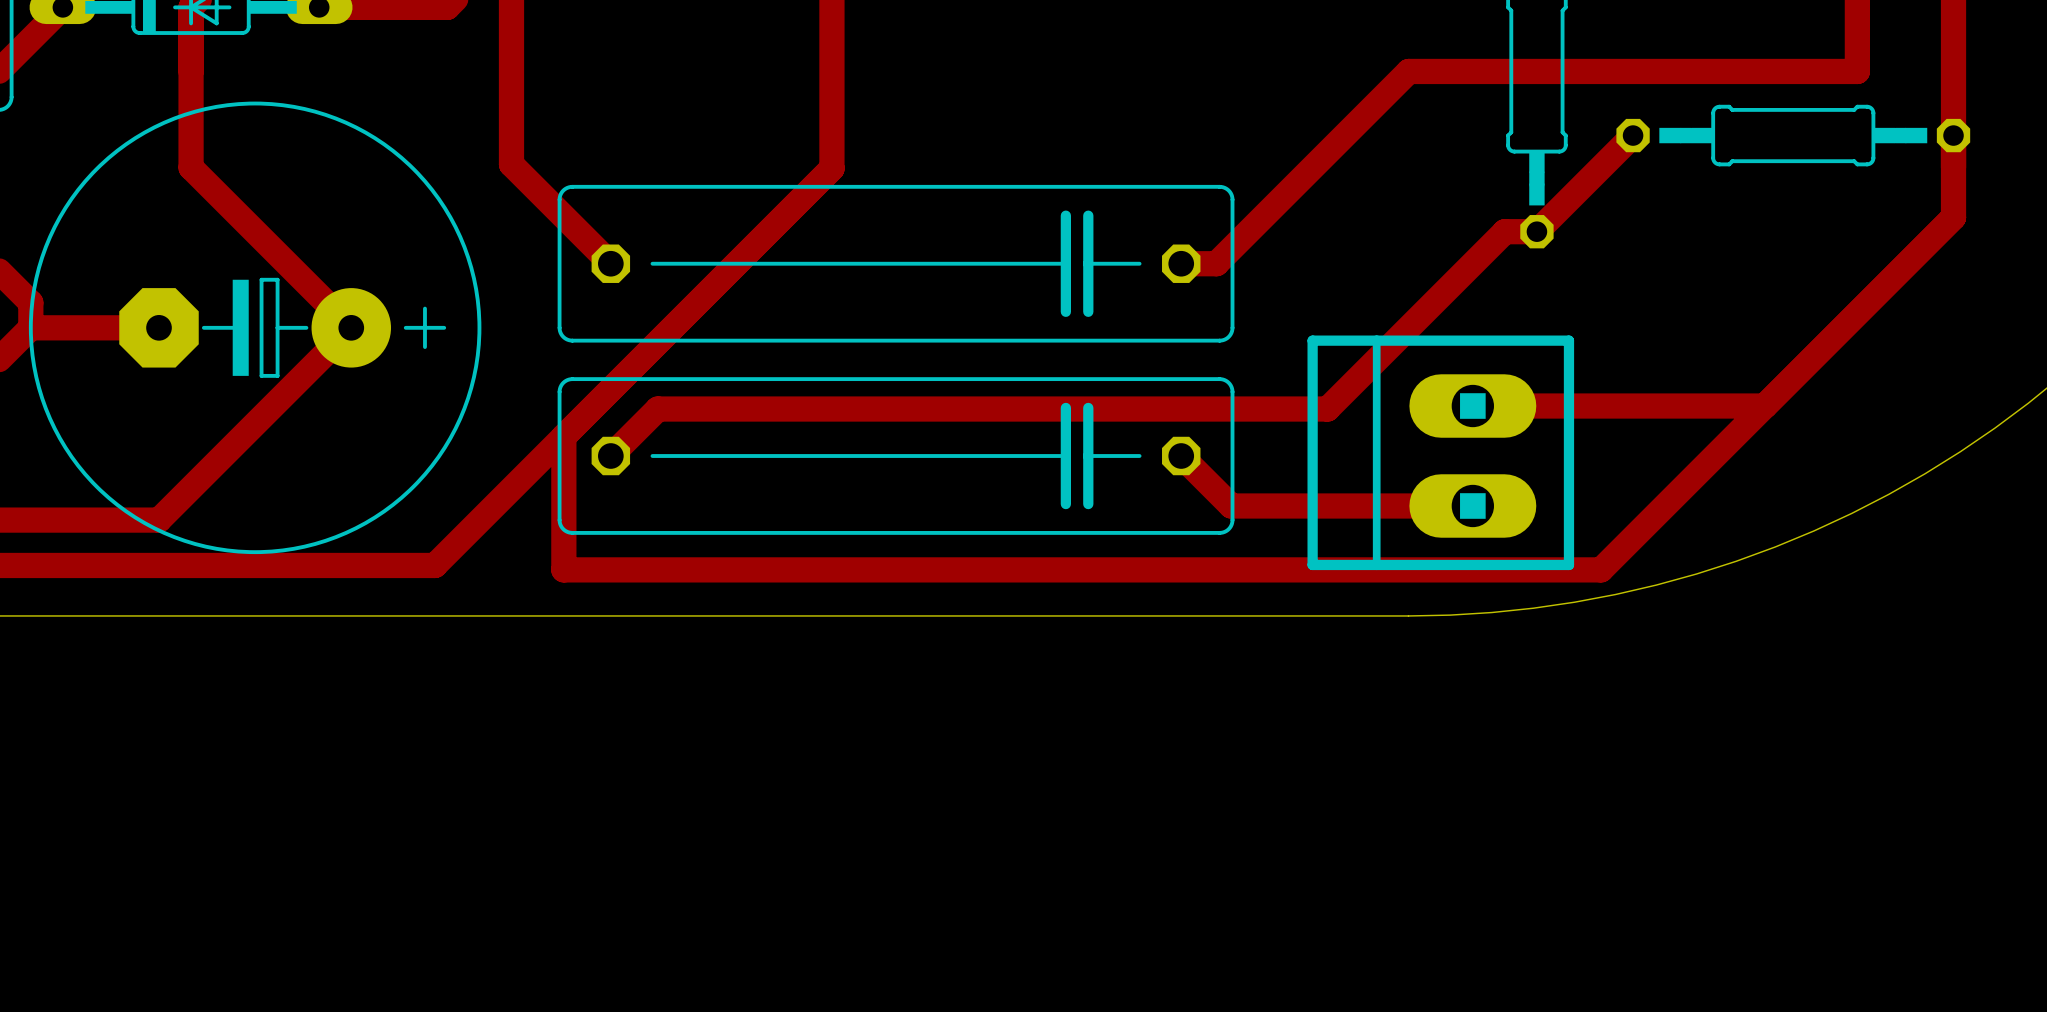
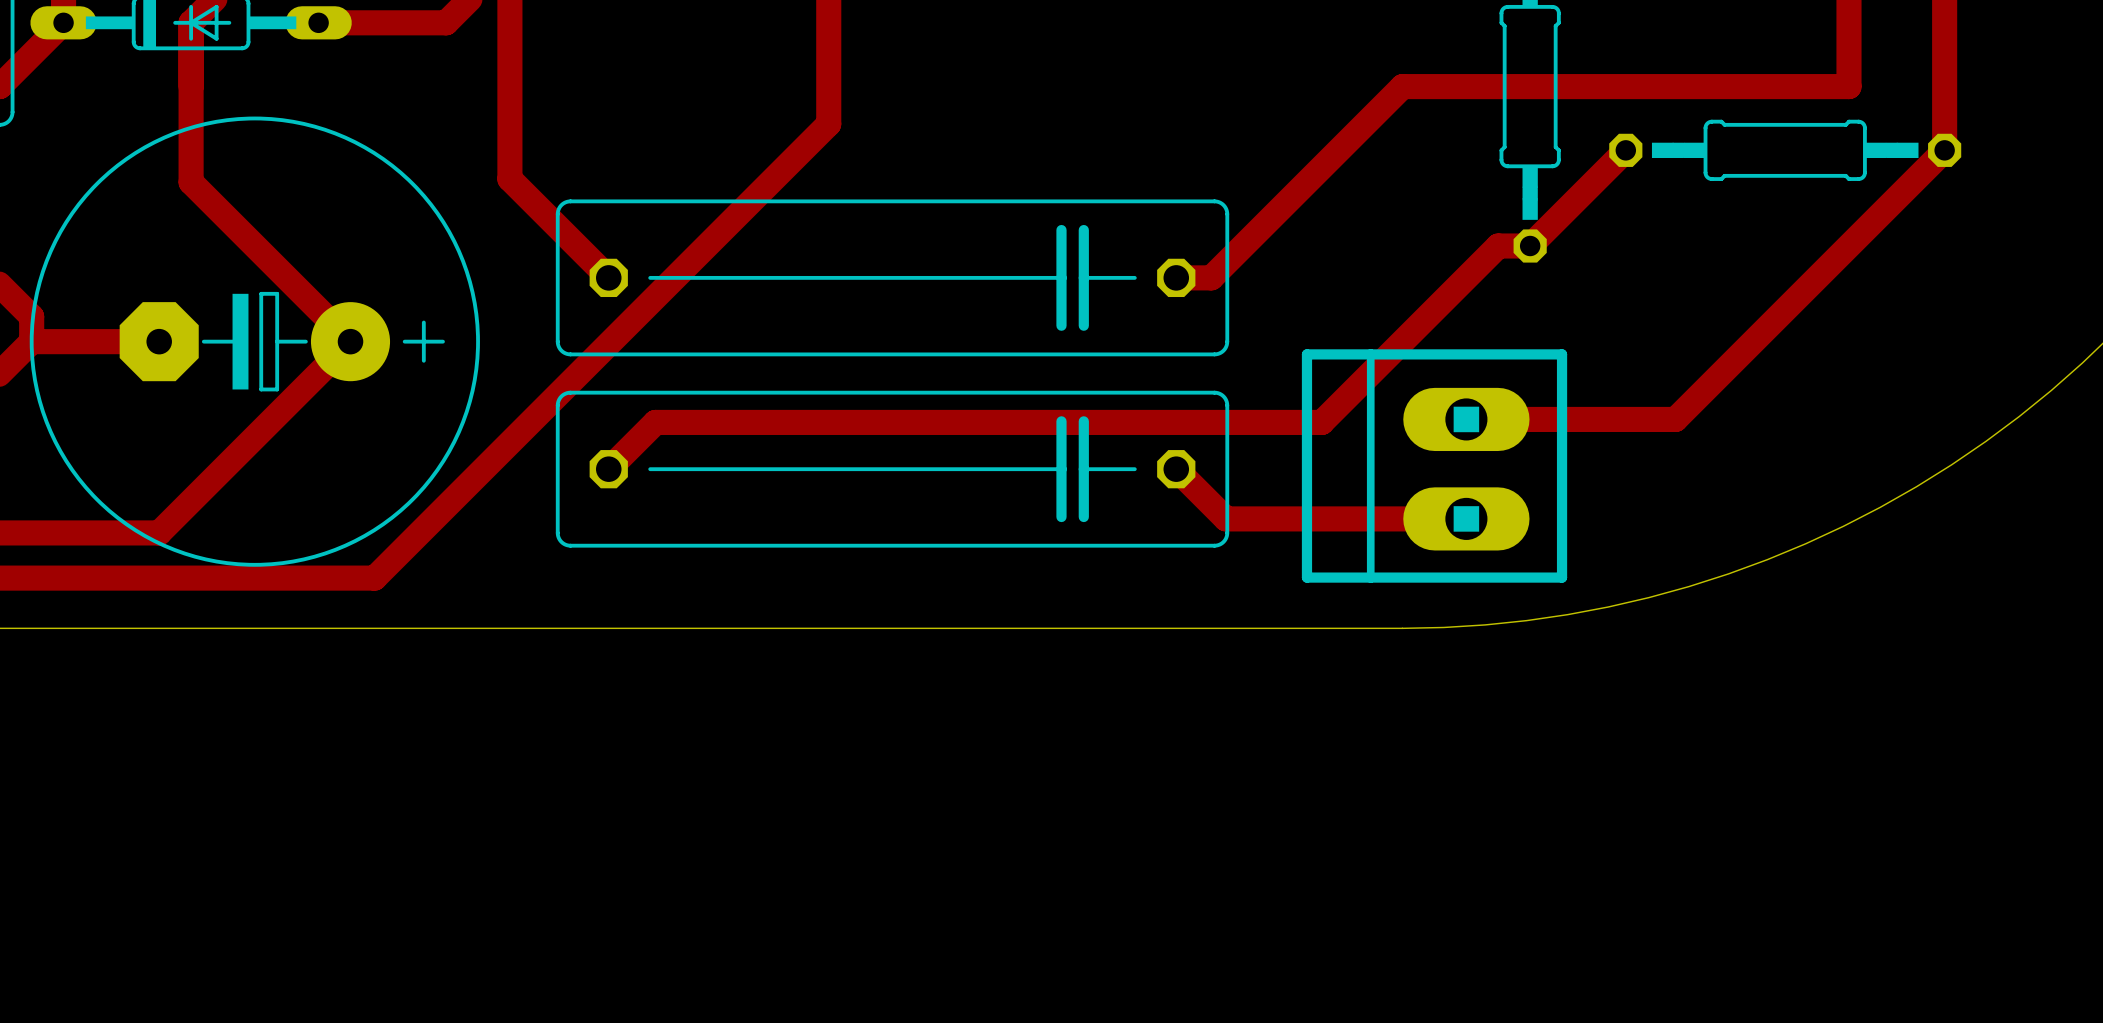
top track: (831, 109) (831, 168) (434, 565) (375, 565) -> (828, 124) (374, 578)
top track: (1953, 135) (1953, 217) (1601, 569) (563, 569) (563, 436) -> none
top track: (1683, 406) (1764, 406) -> (1675, 419) (1944, 150)

